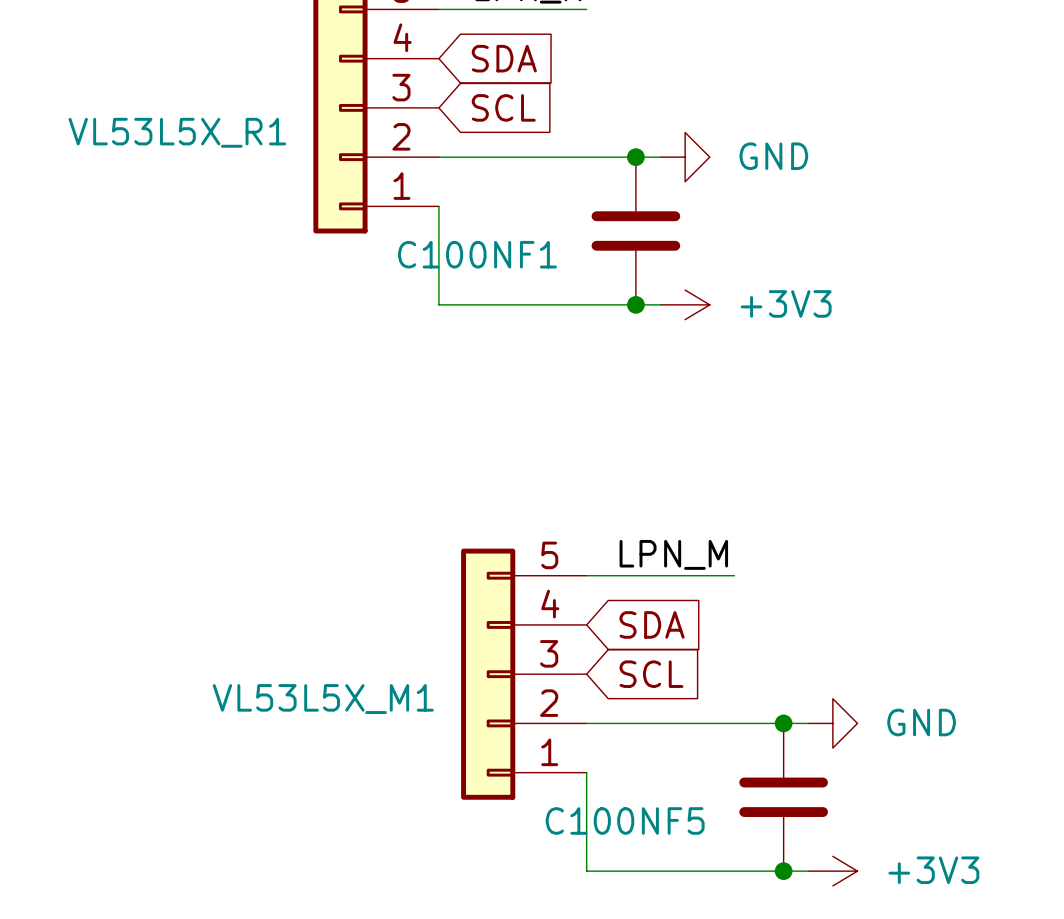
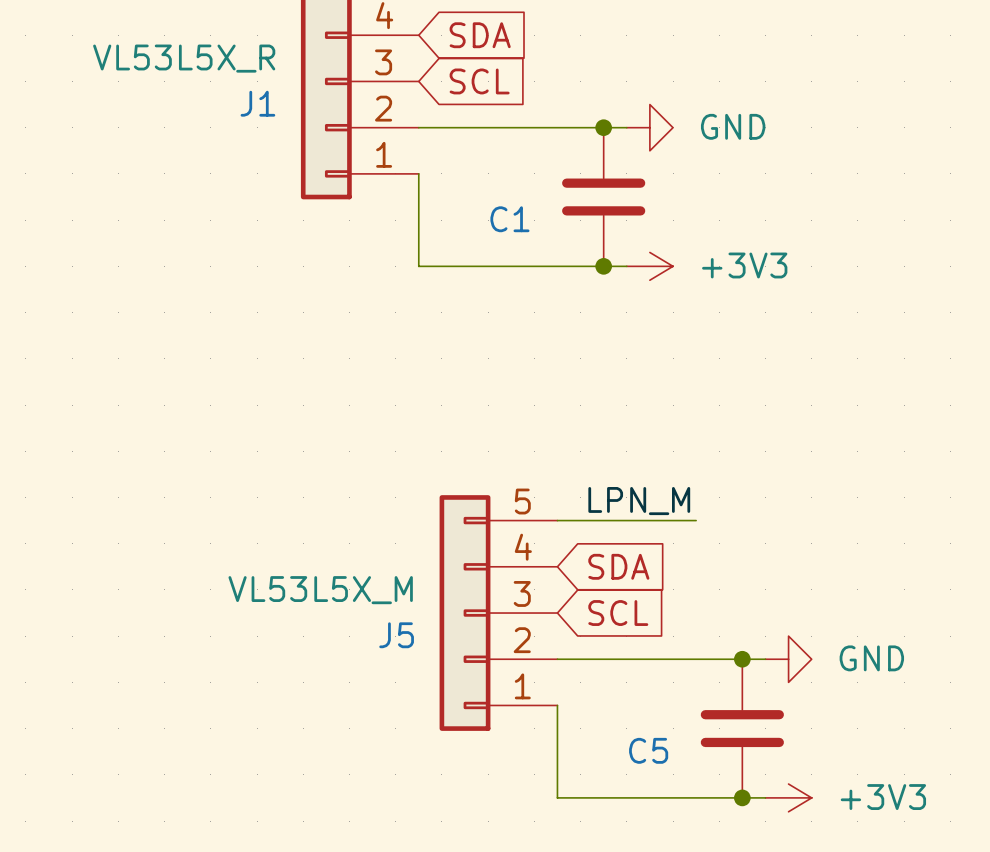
VL53L5X_R1 value: none -> VL53L5X_R (184, 58)
VL53L5X_R1 name: VL53L5X_R1 (177, 132) -> J1 (257, 103)
C100NF1 name: C100NF1 (477, 254) -> C1 (509, 219)
VL53L5X_M1 value: none -> VL53L5X_M (320, 590)
VL53L5X_M1 name: VL53L5X_M1 (323, 699) -> J5 (396, 635)
C100NF5 name: C100NF5 (625, 820) -> C5 (648, 750)

